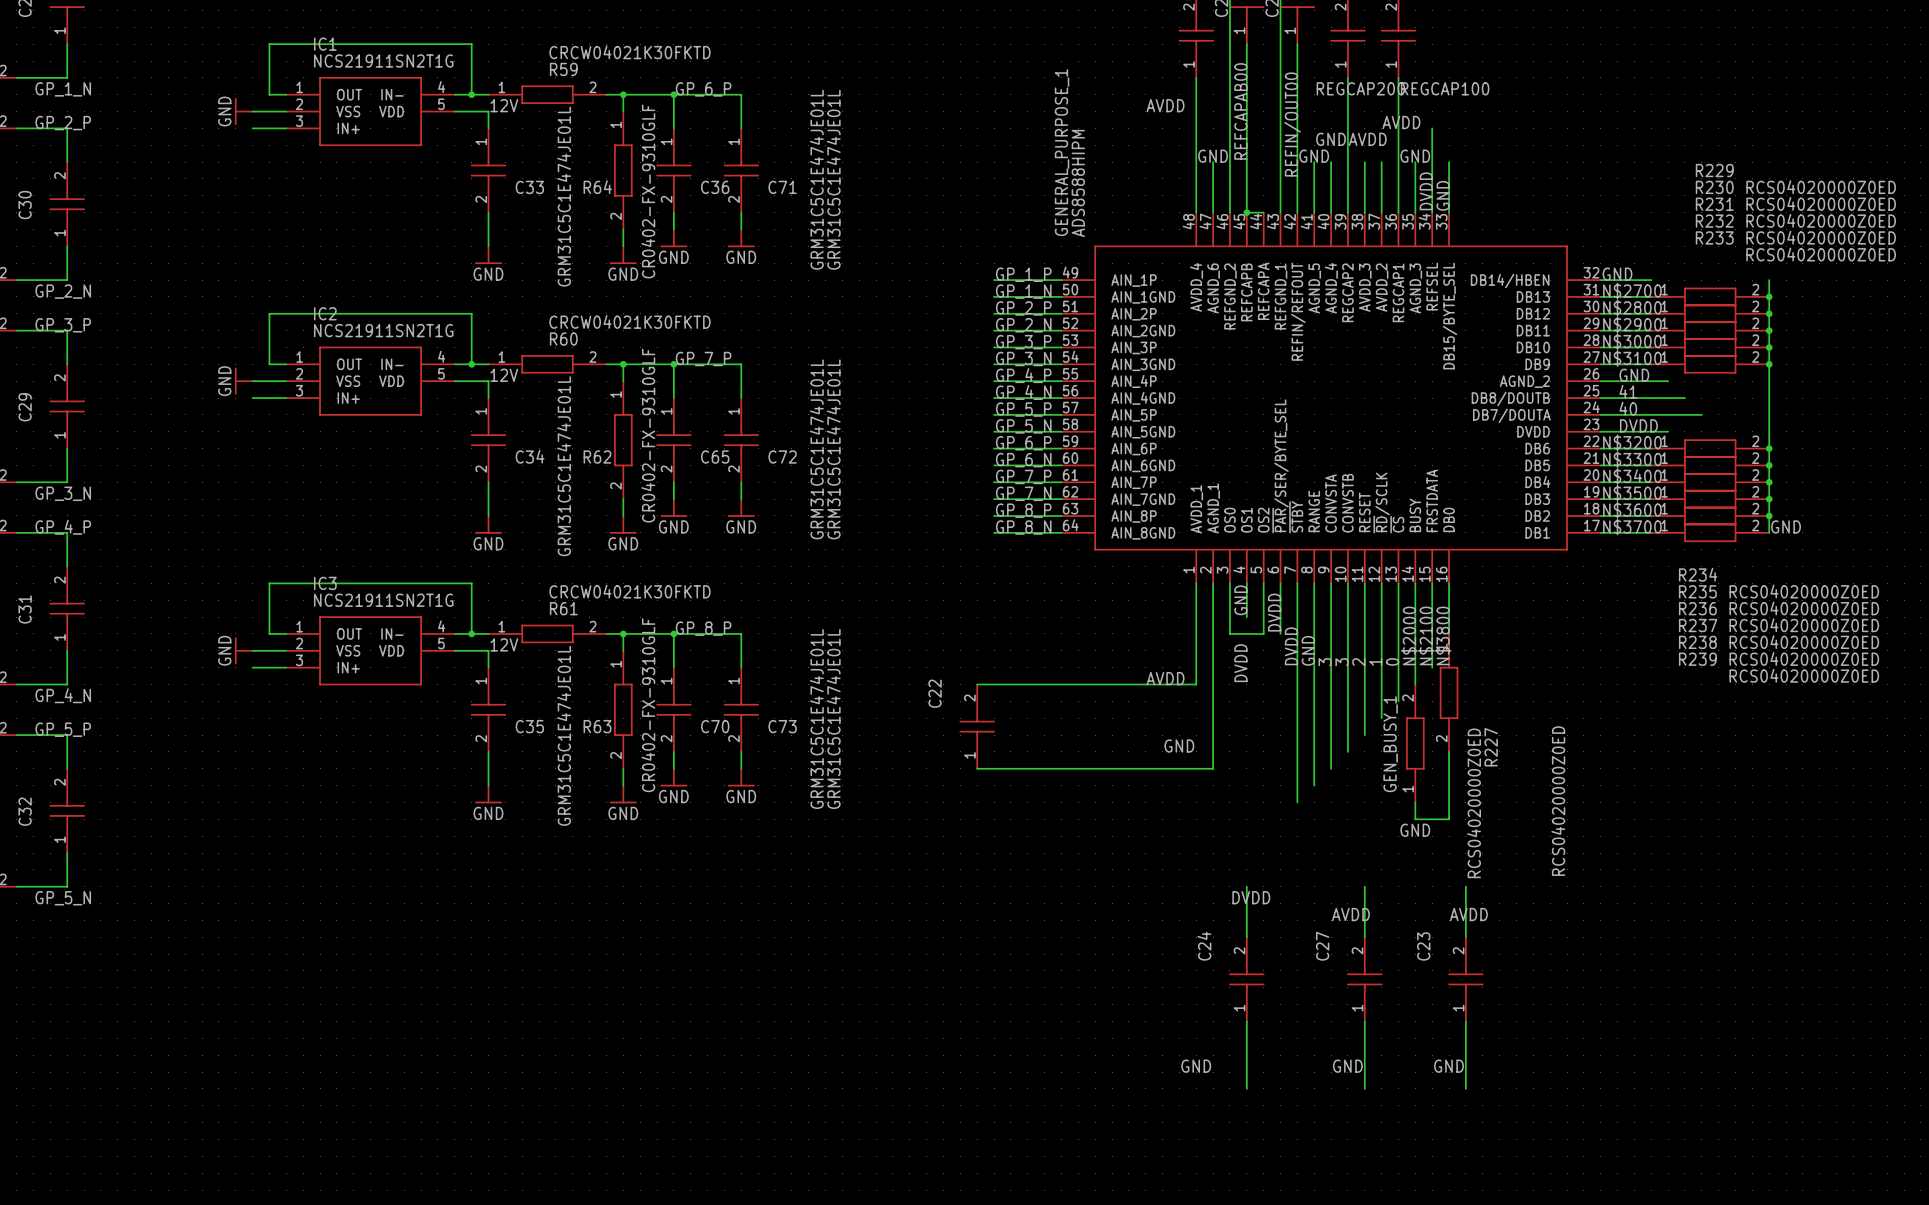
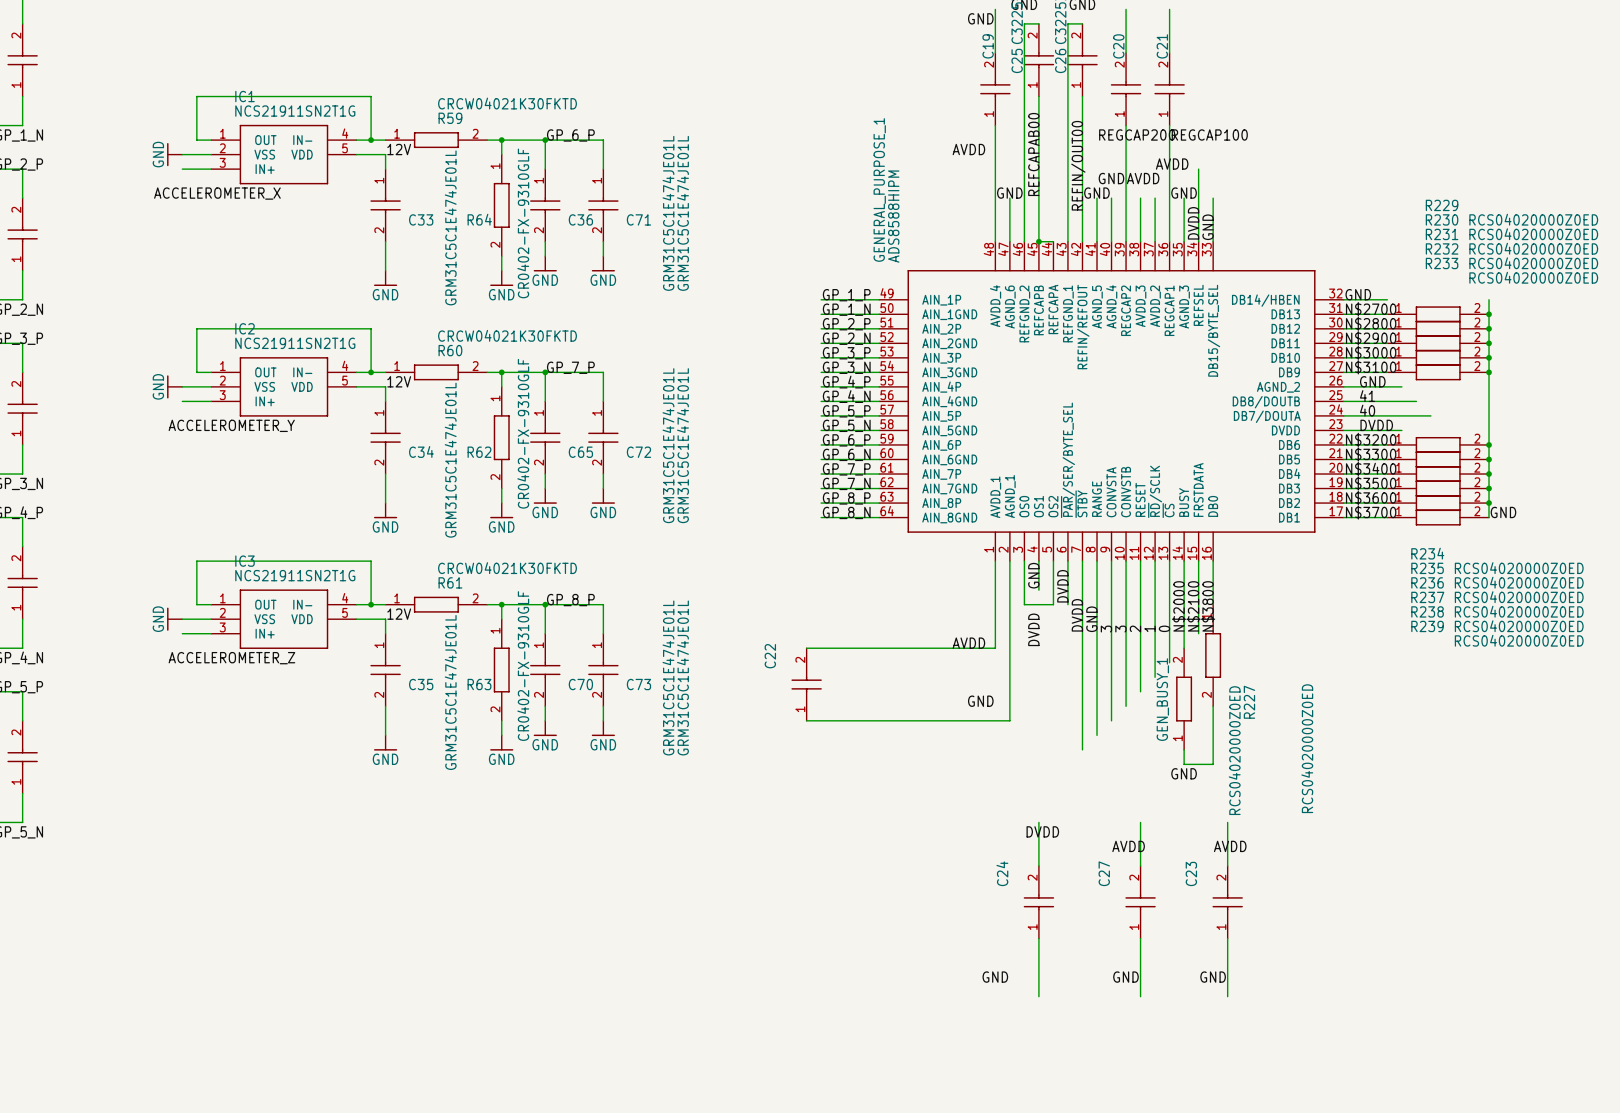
label: none -> ACCELEROMETER_X (217, 193)
label: none -> ACCELEROMETER_Y (231, 425)
label: none -> ACCELEROMETER_Z (231, 658)

